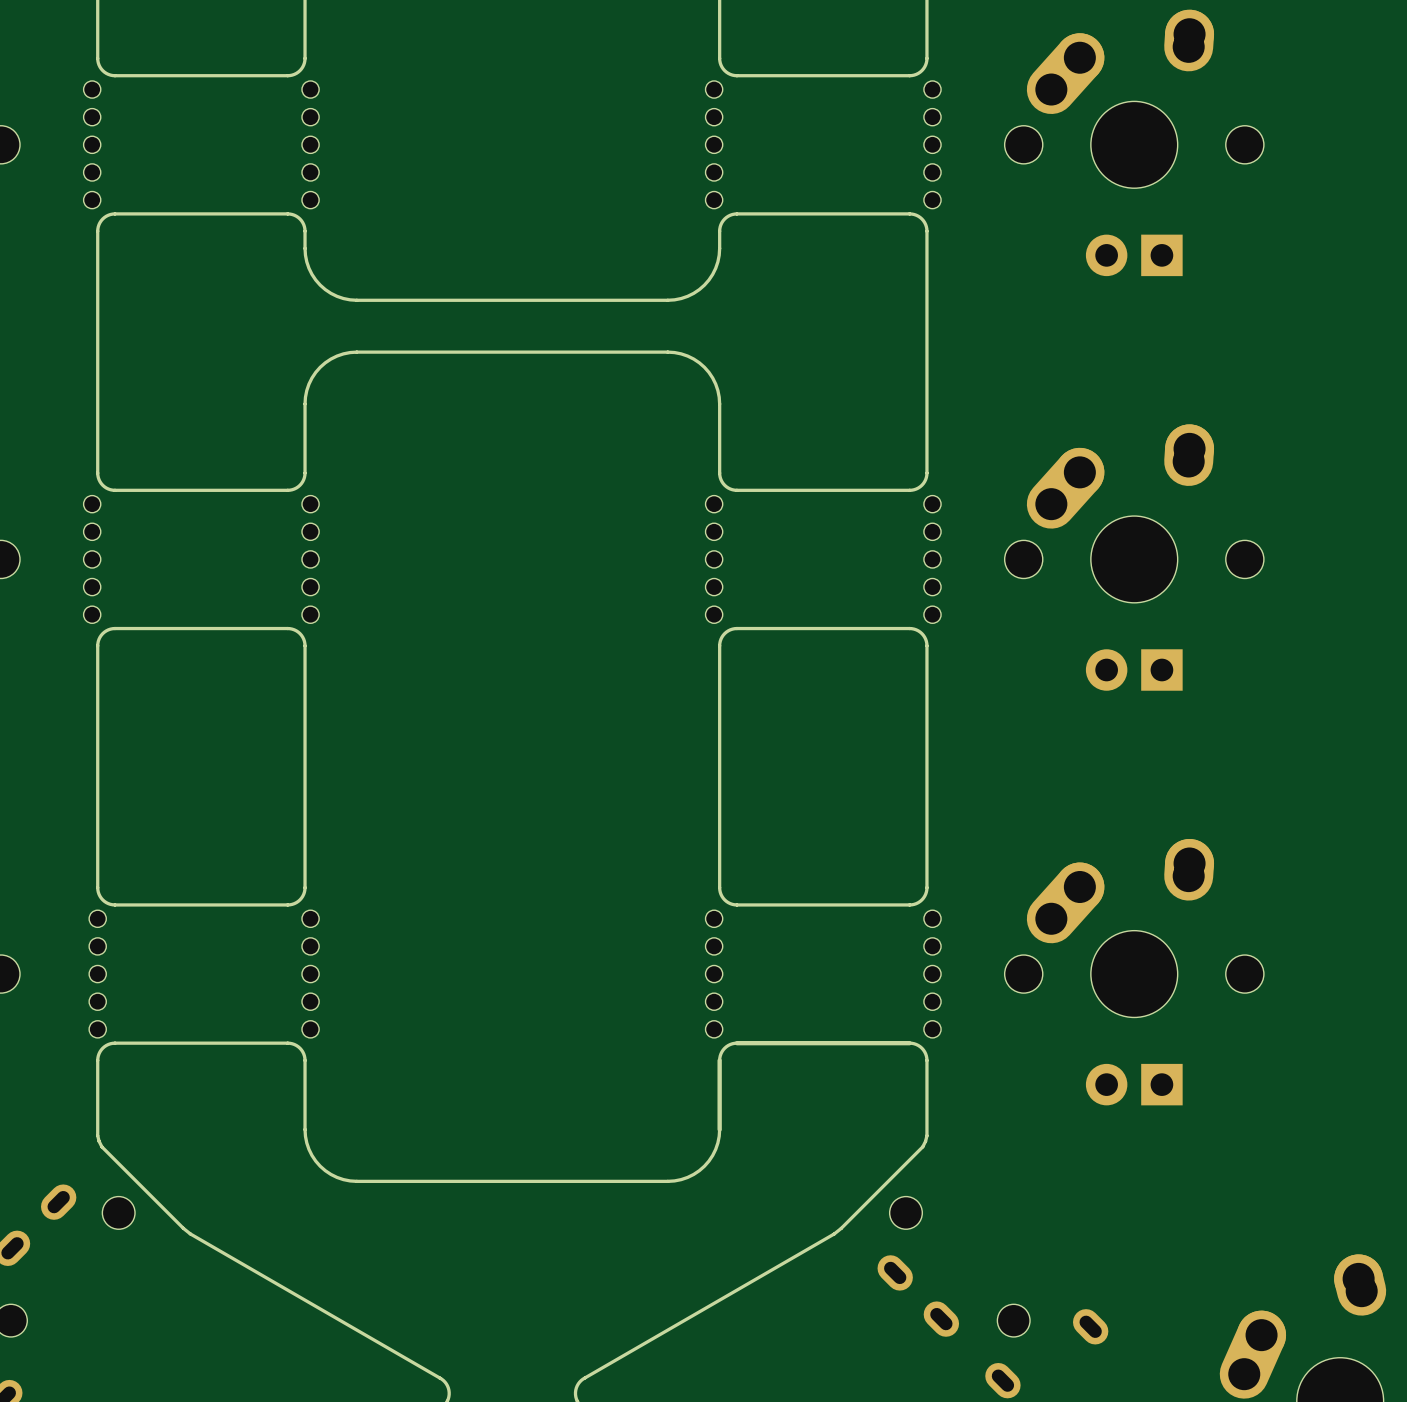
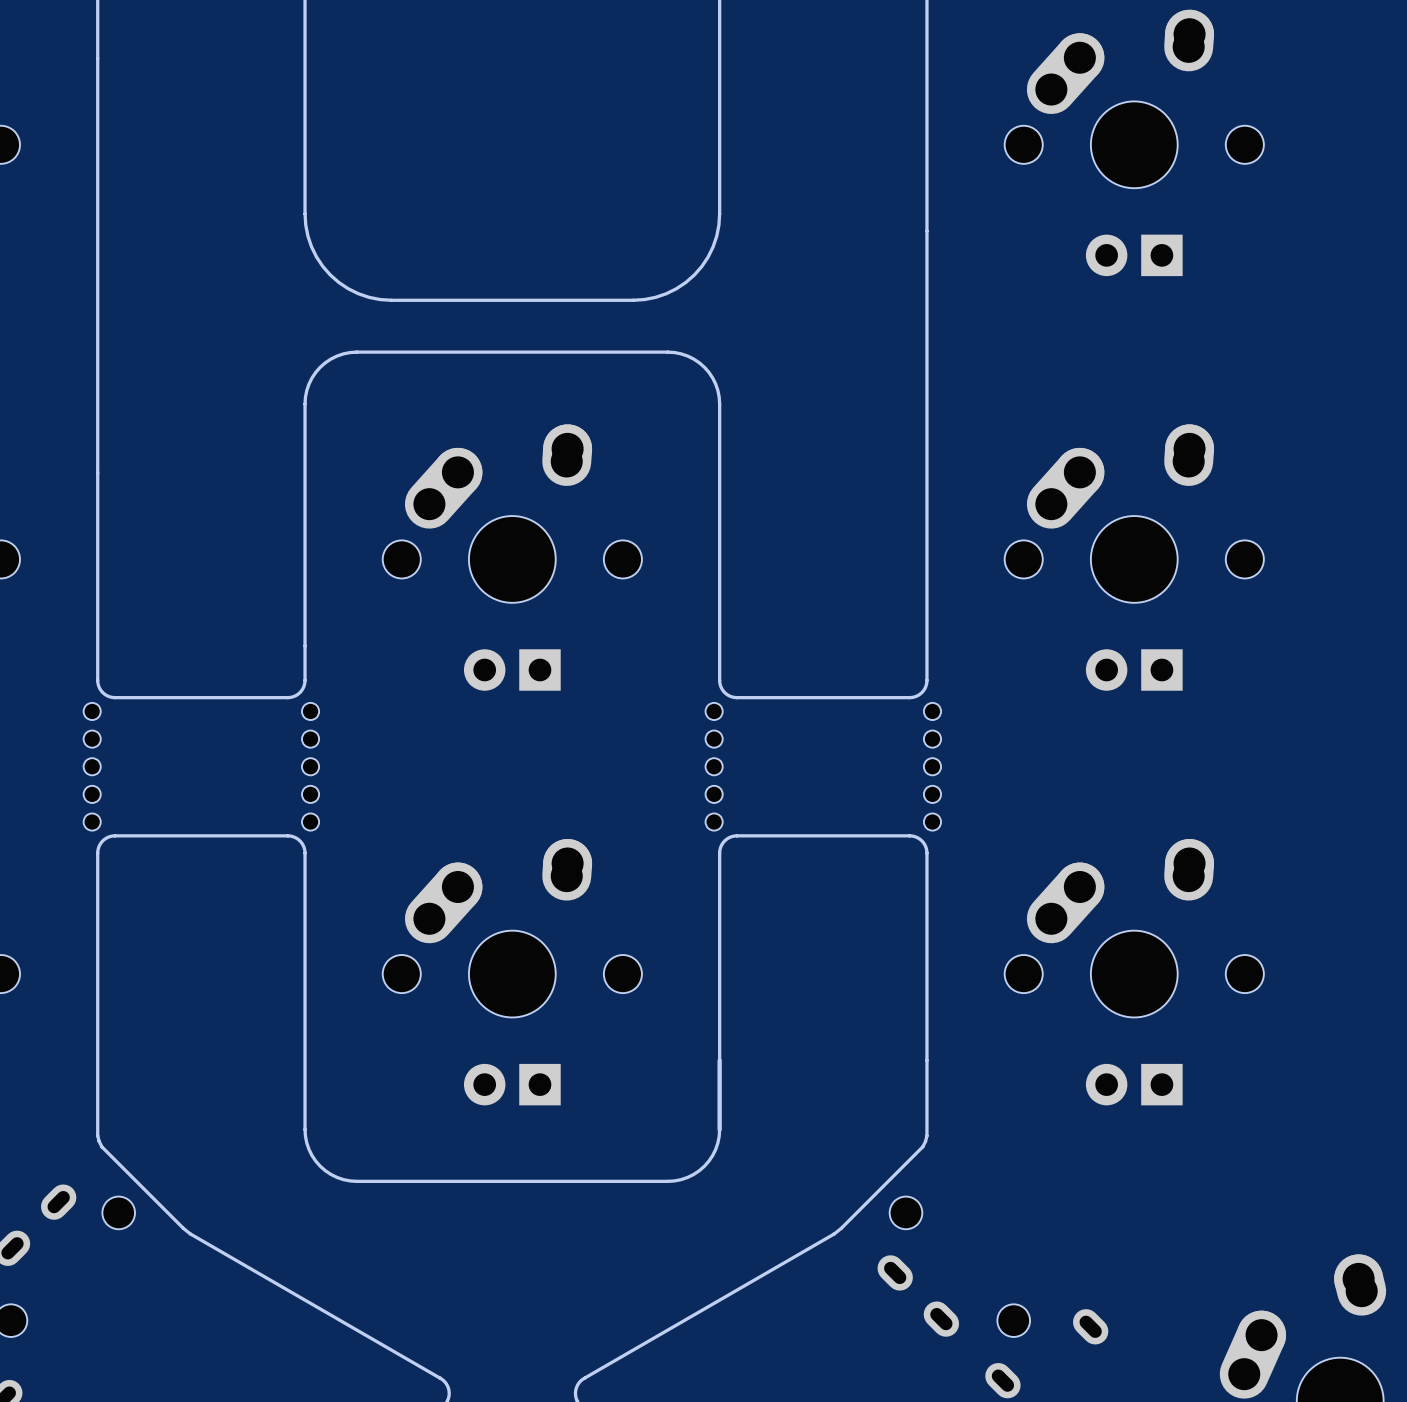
board edge: (97, 58) (102, 70) (114, 75) (290, 75) (301, 68) (305, 58) -> (97, 58) (97, 231)
board edge: (719, 58) (724, 70) (734, 75) (909, 75) (921, 70) (926, 58) -> (926, 231) (926, 58)
part: (92, 144) -> none
part: (310, 144) -> none
part: (714, 144) -> none
part: (932, 144) -> none
board edge: (97, 231) (102, 218) (112, 214) (292, 214) (298, 217) (303, 224) (306, 261) (315, 280) (325, 289) (337, 296) (350, 299) (391, 300) -> (305, 58) (305, 213) (311, 246) (322, 266) (348, 288) (369, 297) (391, 300)
board edge: (926, 231) (921, 218) (911, 214) (732, 214) (726, 217) (720, 224) (717, 261) (708, 280) (699, 289) (687, 296) (674, 299) (633, 300) -> (719, 58) (719, 213) (713, 246) (701, 266) (676, 288) (655, 297) (633, 300)
board edge: (97, 473) (102, 485) (114, 490) (290, 490) (299, 485) (305, 473) -> (97, 473) (97, 645)
board edge: (719, 473) (724, 485) (736, 490) (911, 490) (921, 485) (926, 473) -> (719, 473) (719, 645)
part: none -> (512, 557)
part: (92, 559) -> none
part: (310, 559) -> none
part: (714, 559) -> none
part: (932, 559) -> none
board edge: (97, 645) (102, 633) (114, 628) (290, 628) (299, 633) (305, 645) -> (305, 473) (305, 645)
board edge: (719, 645) (724, 633) (736, 628) (911, 628) (921, 633) (926, 645) -> (926, 473) (926, 645)
board edge: (97, 680) (97, 853) -> (305, 853) (299, 840) (287, 835) (112, 836) (101, 842) (97, 853)
board edge: (305, 680) (305, 853) -> (305, 680) (301, 690) (290, 697) (114, 697) (102, 692) (97, 680)
board edge: (719, 680) (719, 853) -> (719, 680) (724, 692) (734, 697) (909, 697) (921, 692) (926, 680)
board edge: (926, 680) (926, 853) -> (719, 853) (724, 840) (736, 835) (911, 836) (921, 840) (926, 853)
part: none -> (92, 766)
part: none -> (310, 766)
part: none -> (714, 766)
part: none -> (932, 766)
board edge: (97, 887) (102, 899) (114, 904) (290, 904) (301, 898) (305, 887) -> (305, 1060) (305, 887)
board edge: (719, 887) (724, 899) (734, 904) (909, 904) (921, 899) (926, 887) -> (719, 887) (719, 1060)
part: none -> (512, 972)
part: (97, 974) -> none
part: (310, 974) -> none
part: (714, 974) -> none
part: (932, 974) -> none
board edge: (97, 1060) (102, 1048) (114, 1043) (290, 1043) (299, 1048) (305, 1060) -> (97, 1060) (97, 887)
board edge: (719, 1060) (724, 1048) (736, 1043) (911, 1043) (921, 1048) (926, 1060) -> (926, 887) (926, 1060)

